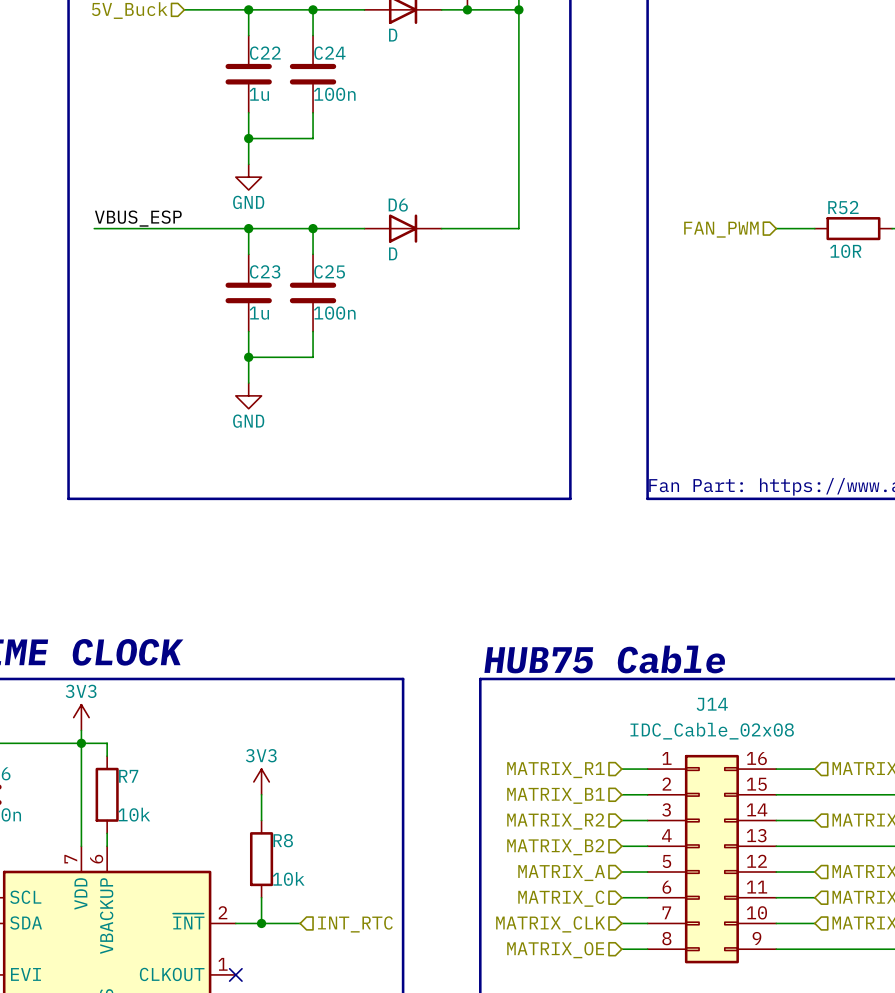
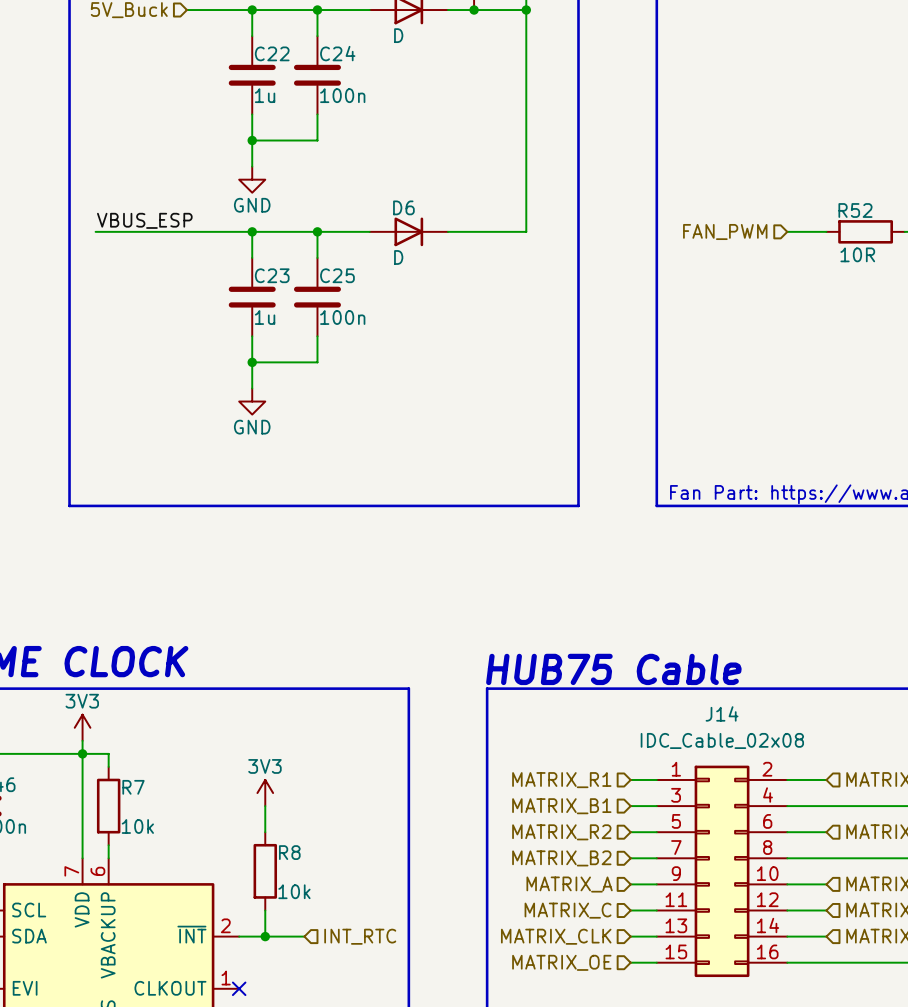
J14 symbol: [647, 754, 777, 964] -> [656, 765, 788, 978]

